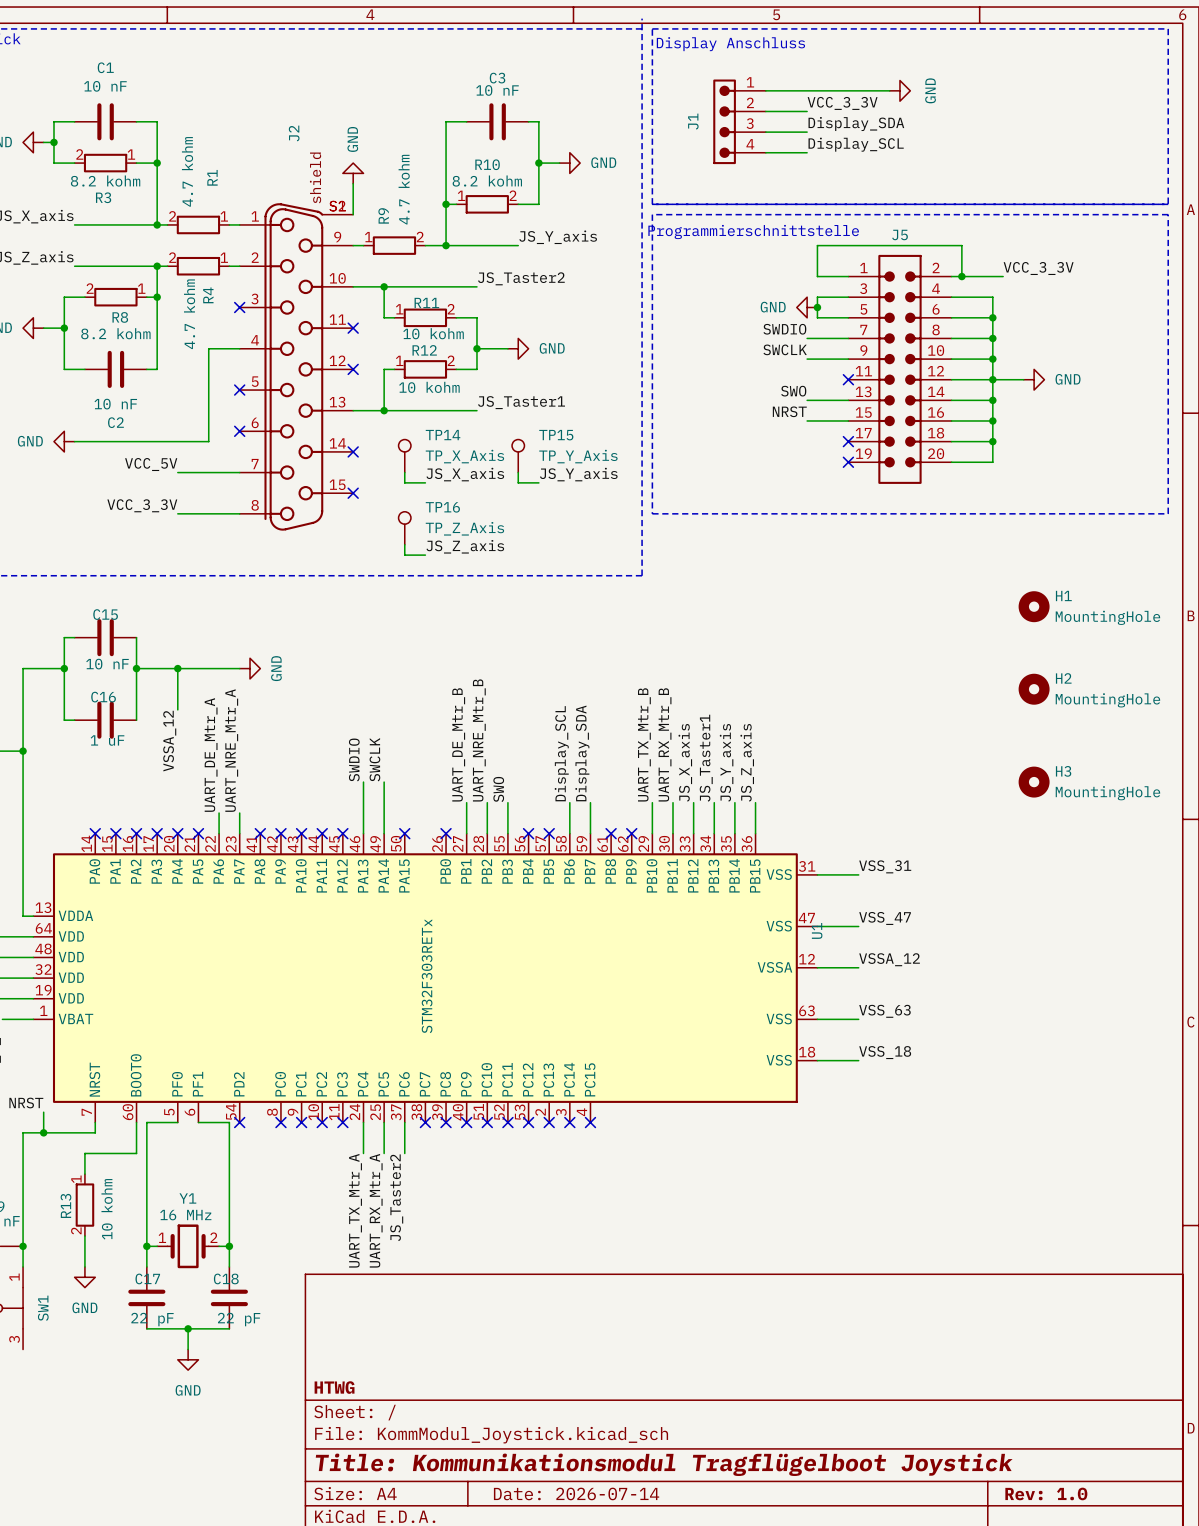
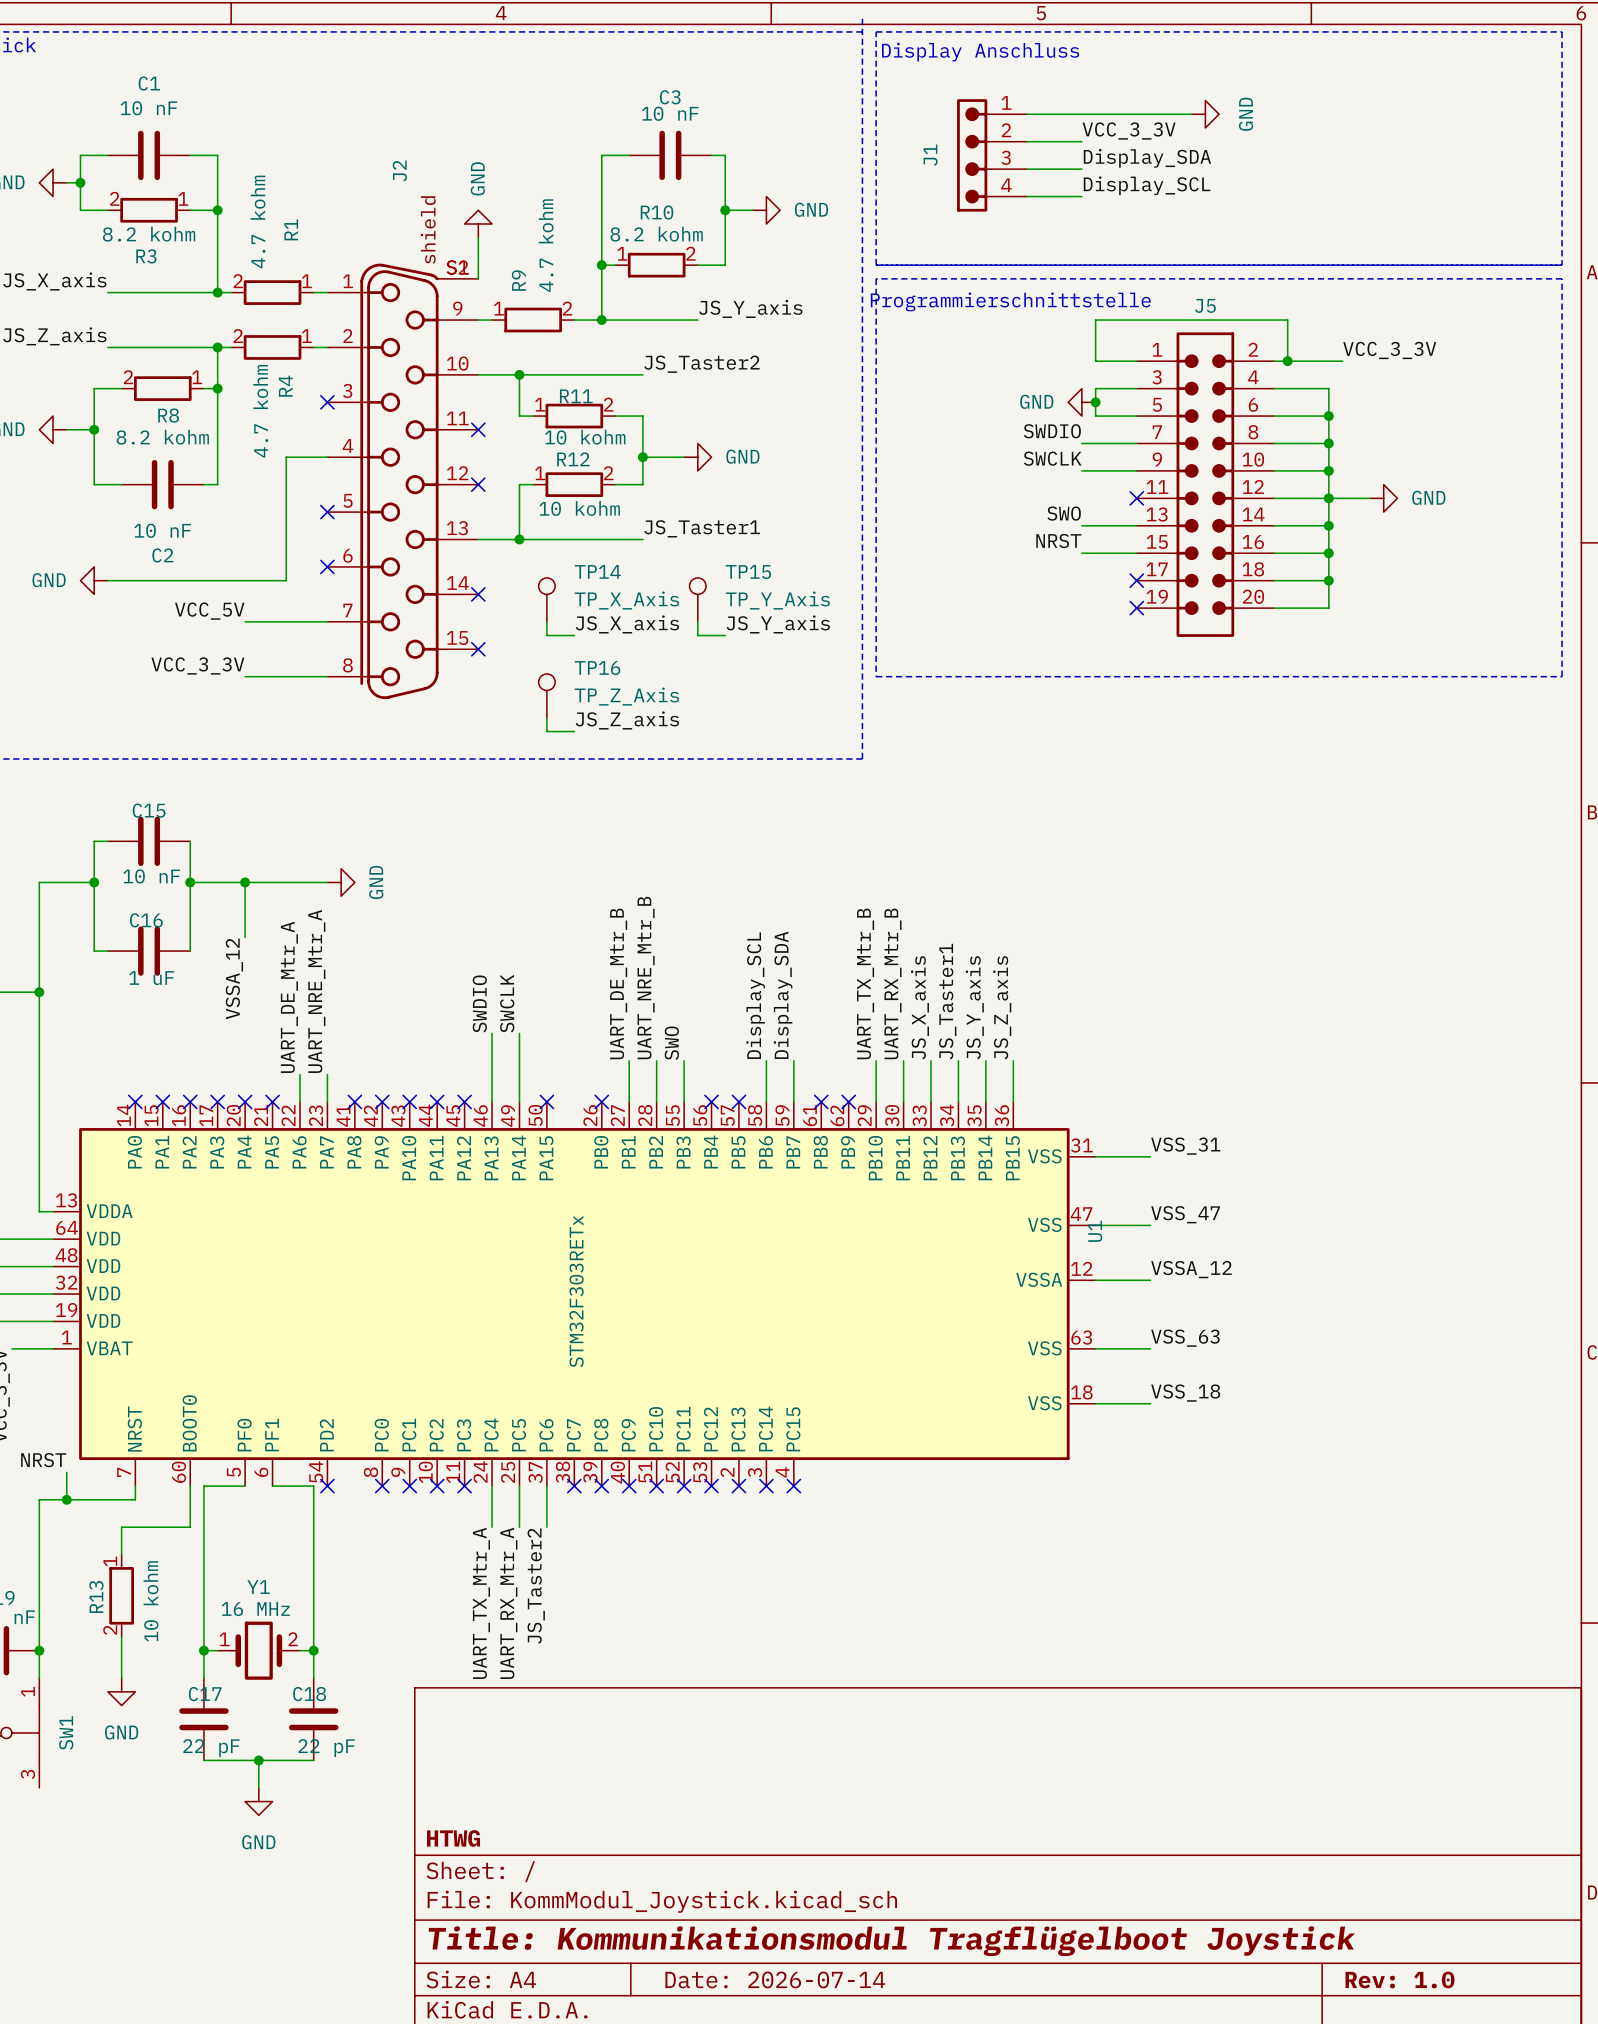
H1: MountingHole (1034, 606) -> none
H2: MountingHole (1034, 689) -> none
H3: MountingHole (1034, 782) -> none

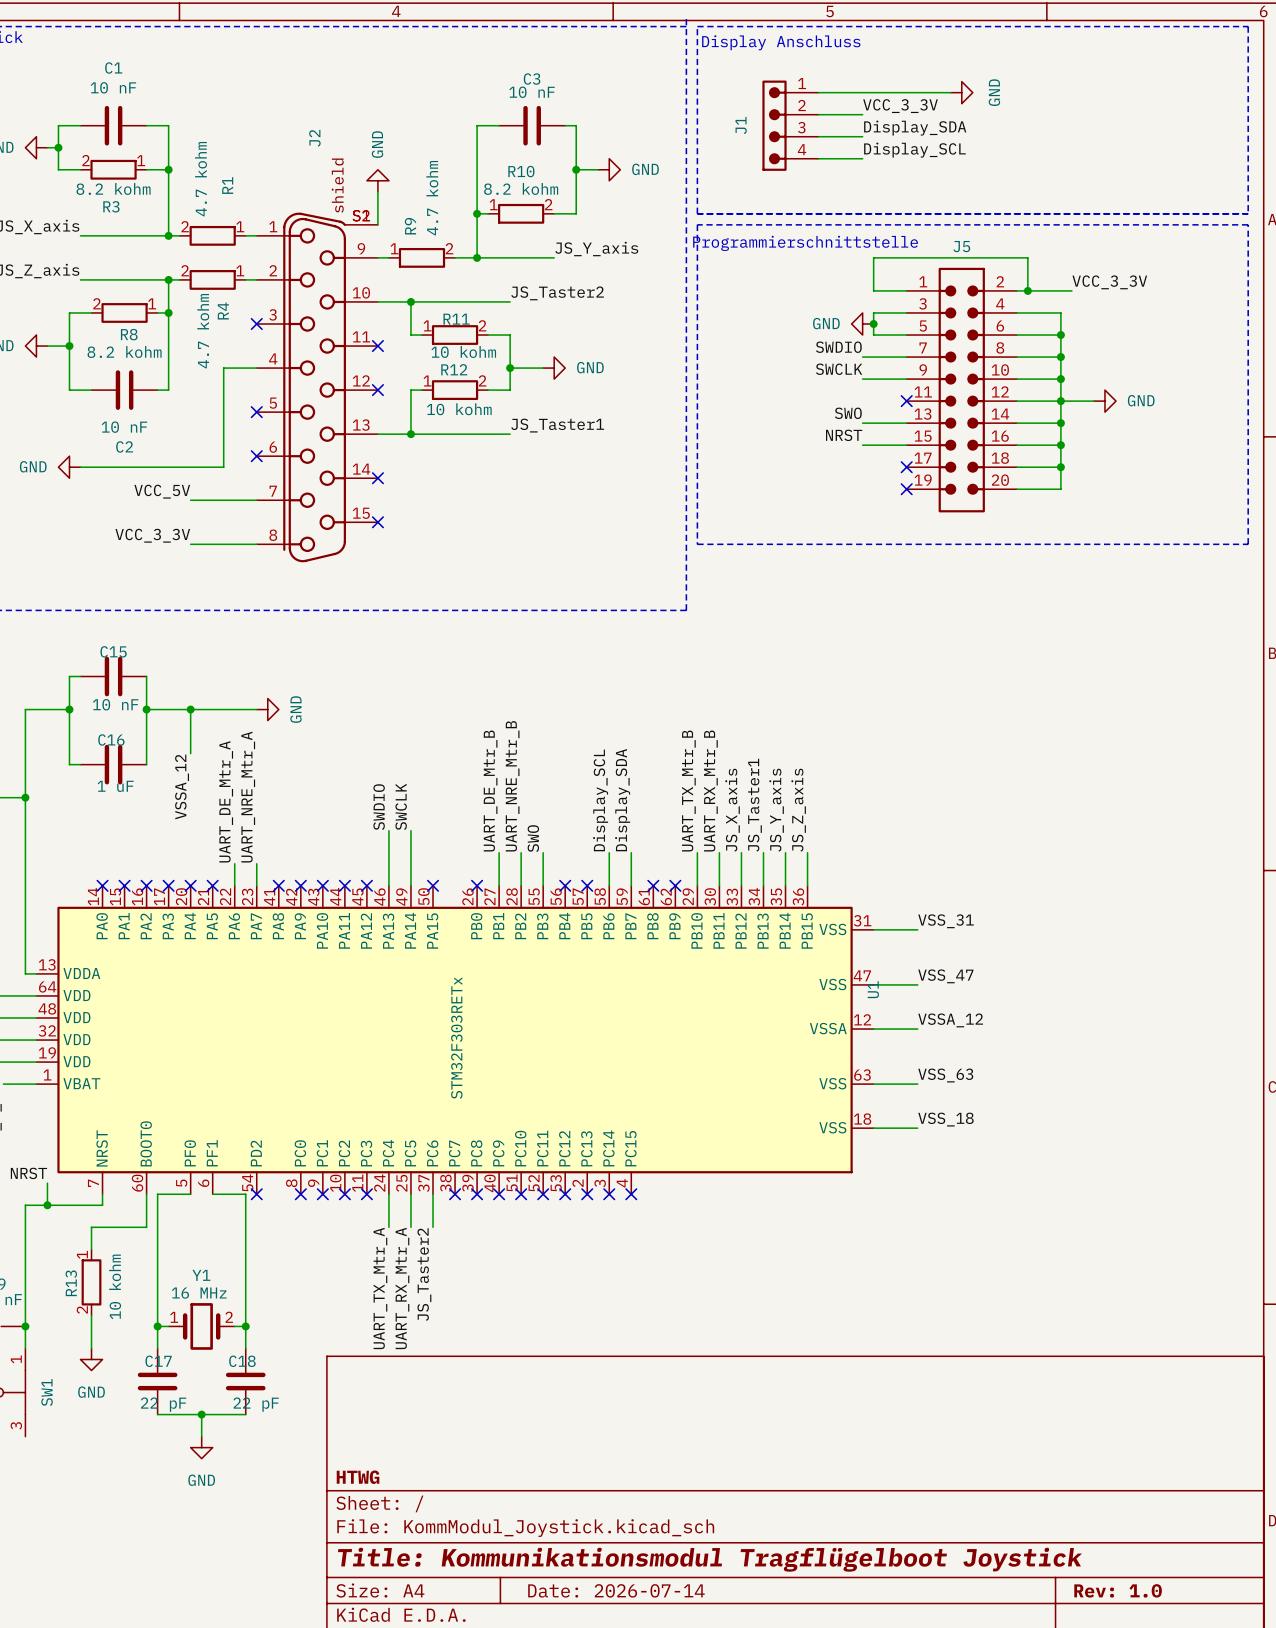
TP14: TP_X_Axis (546, 599) -> none
TP15: TP_Y_Axis (697, 599) -> none
wire: (546, 621) (546, 635) (574, 635) -> none
wire: (697, 621) (697, 635) (725, 635) -> none
label: JS_X_axis (627, 624) -> none
label: JS_Y_axis (778, 624) -> none
TP16: TP_Z_Axis (546, 695) -> none
wire: (546, 717) (546, 731) (574, 731) -> none
label: JS_Z_axis (627, 720) -> none

